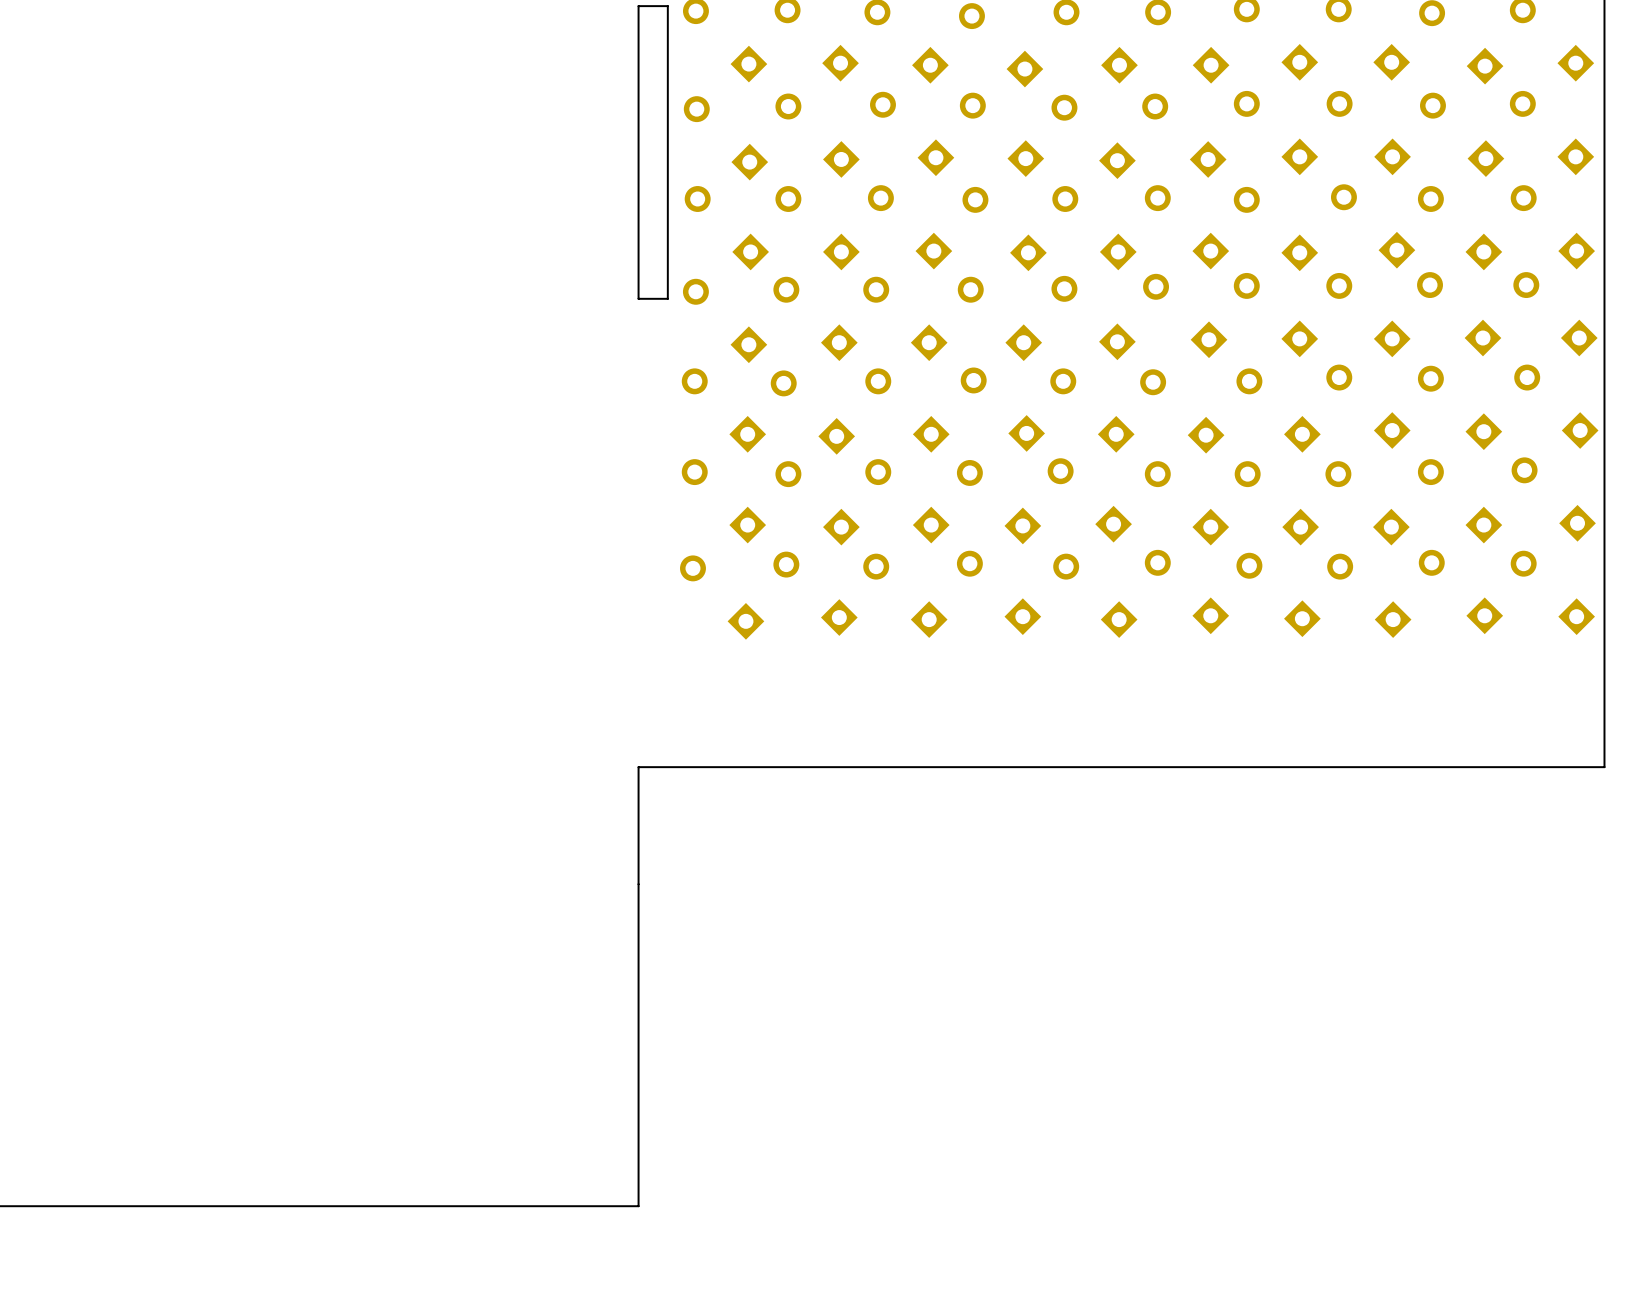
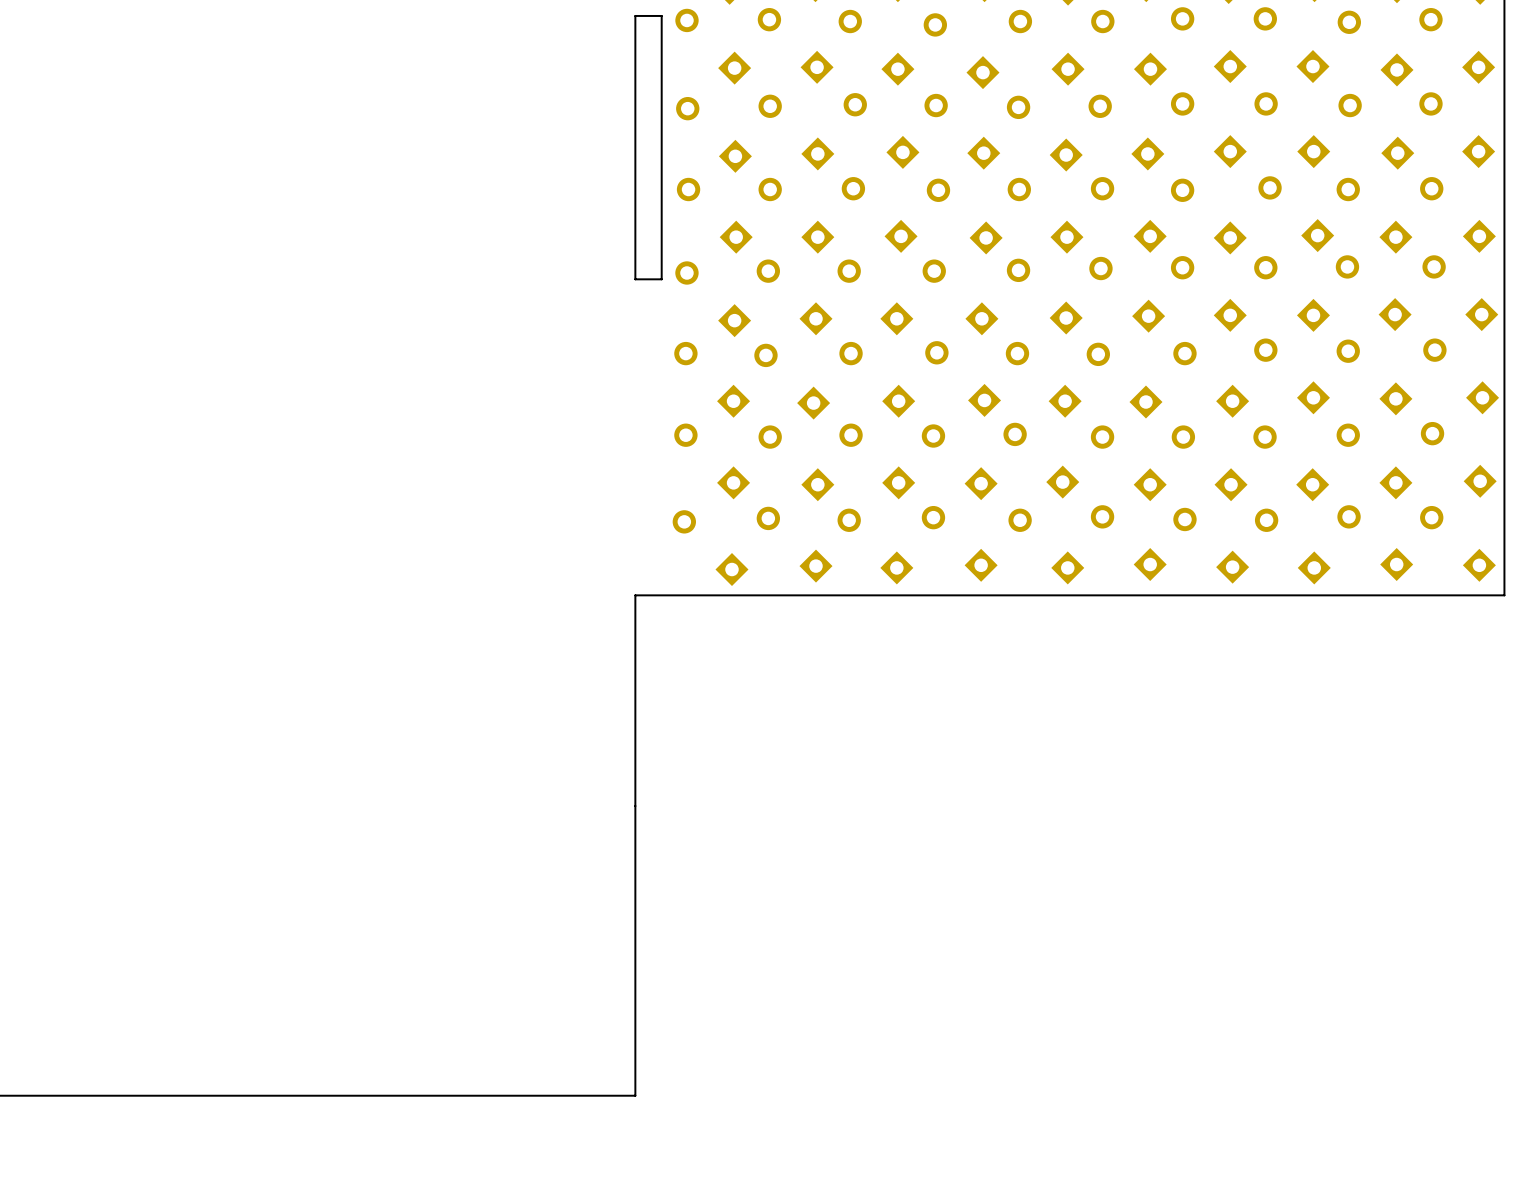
board edge: (1604, 650) (1604, 767) (638, 767) -> (1504, 595) (635, 595) (635, 700)

